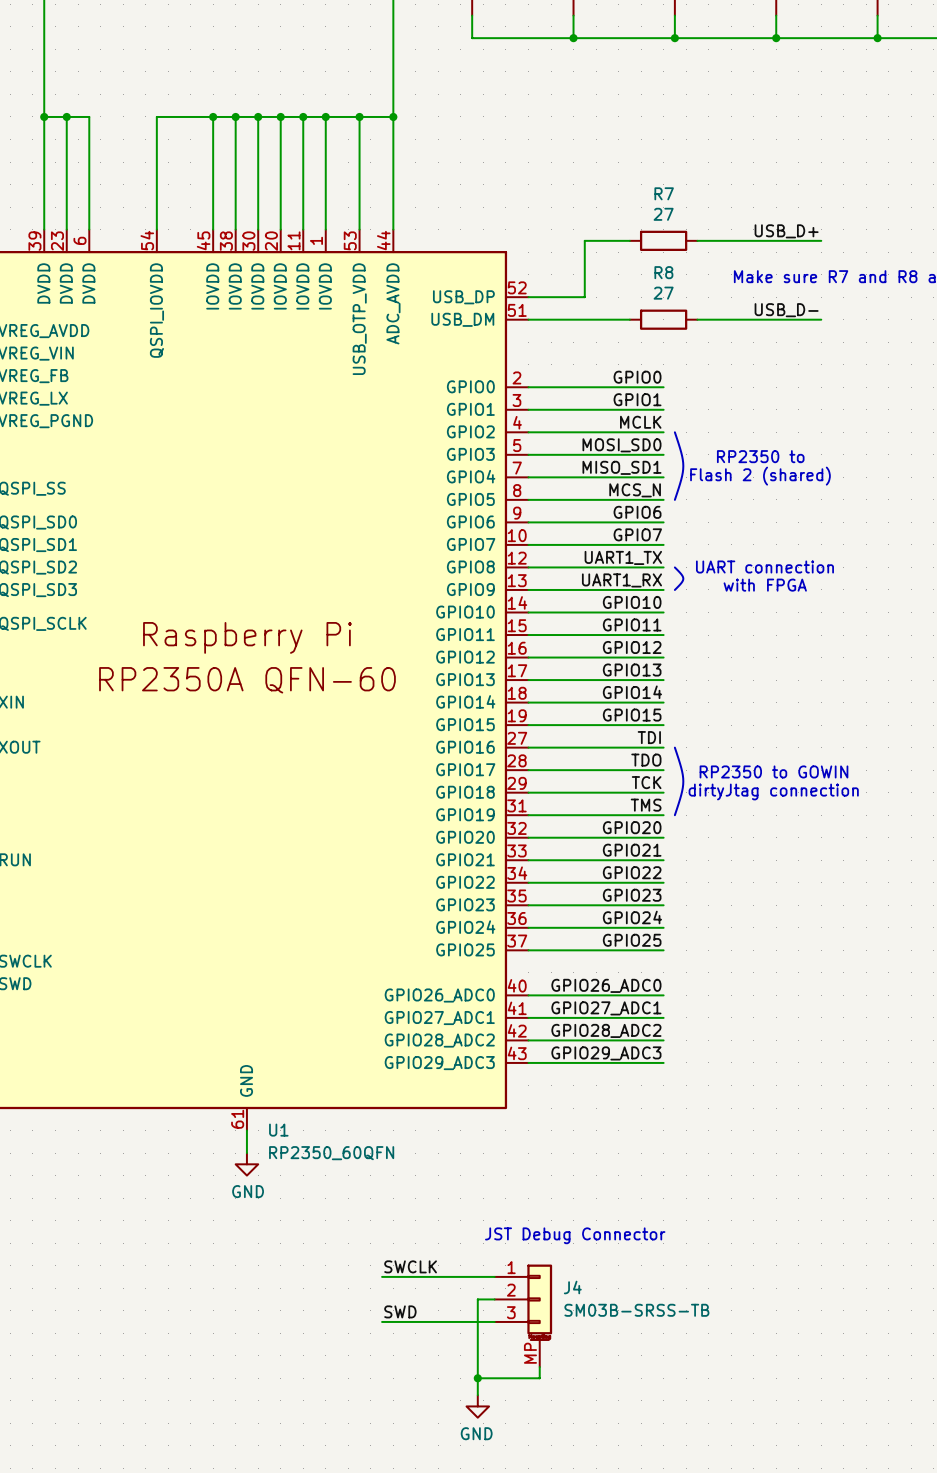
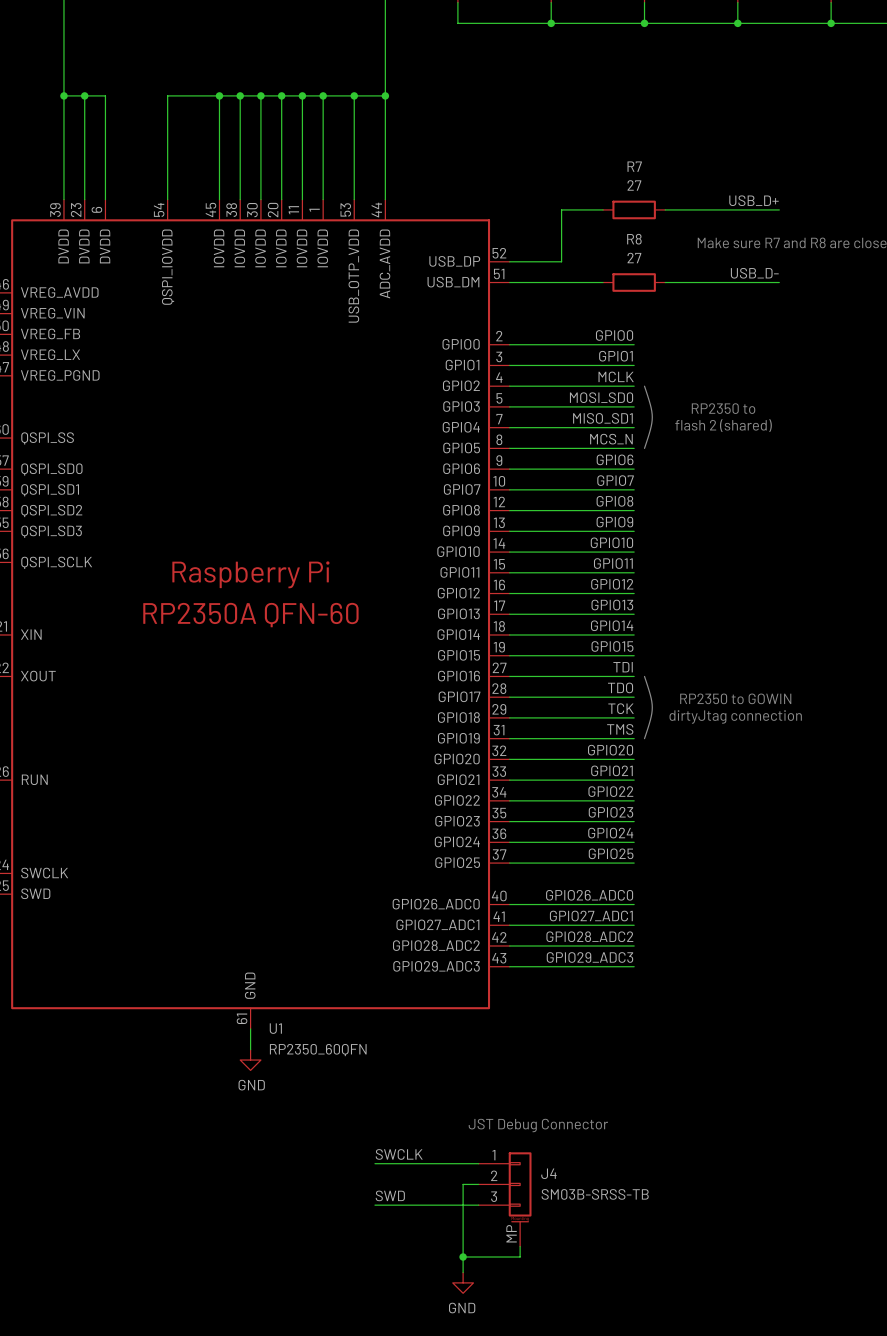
text: Flash 2 (shared) (760, 476) -> flash 2 (shared) (723, 425)
label: UART1_TX (623, 557) -> GPIO8 (614, 501)
line: (674, 567) (683, 578) (674, 589) -> none
text: UART connection (764, 567) -> none
label: UART1_RX (621, 580) -> GPIO9 (614, 522)
text: with FPGA (765, 585) -> none

